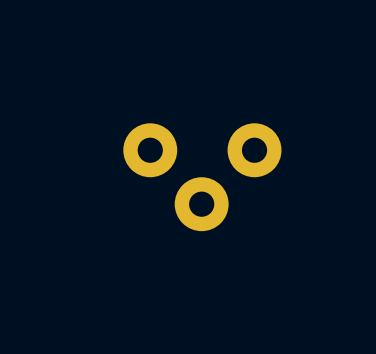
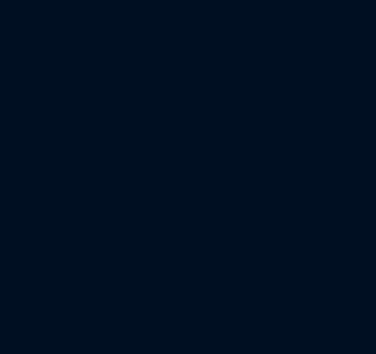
part: (202, 177) -> none

